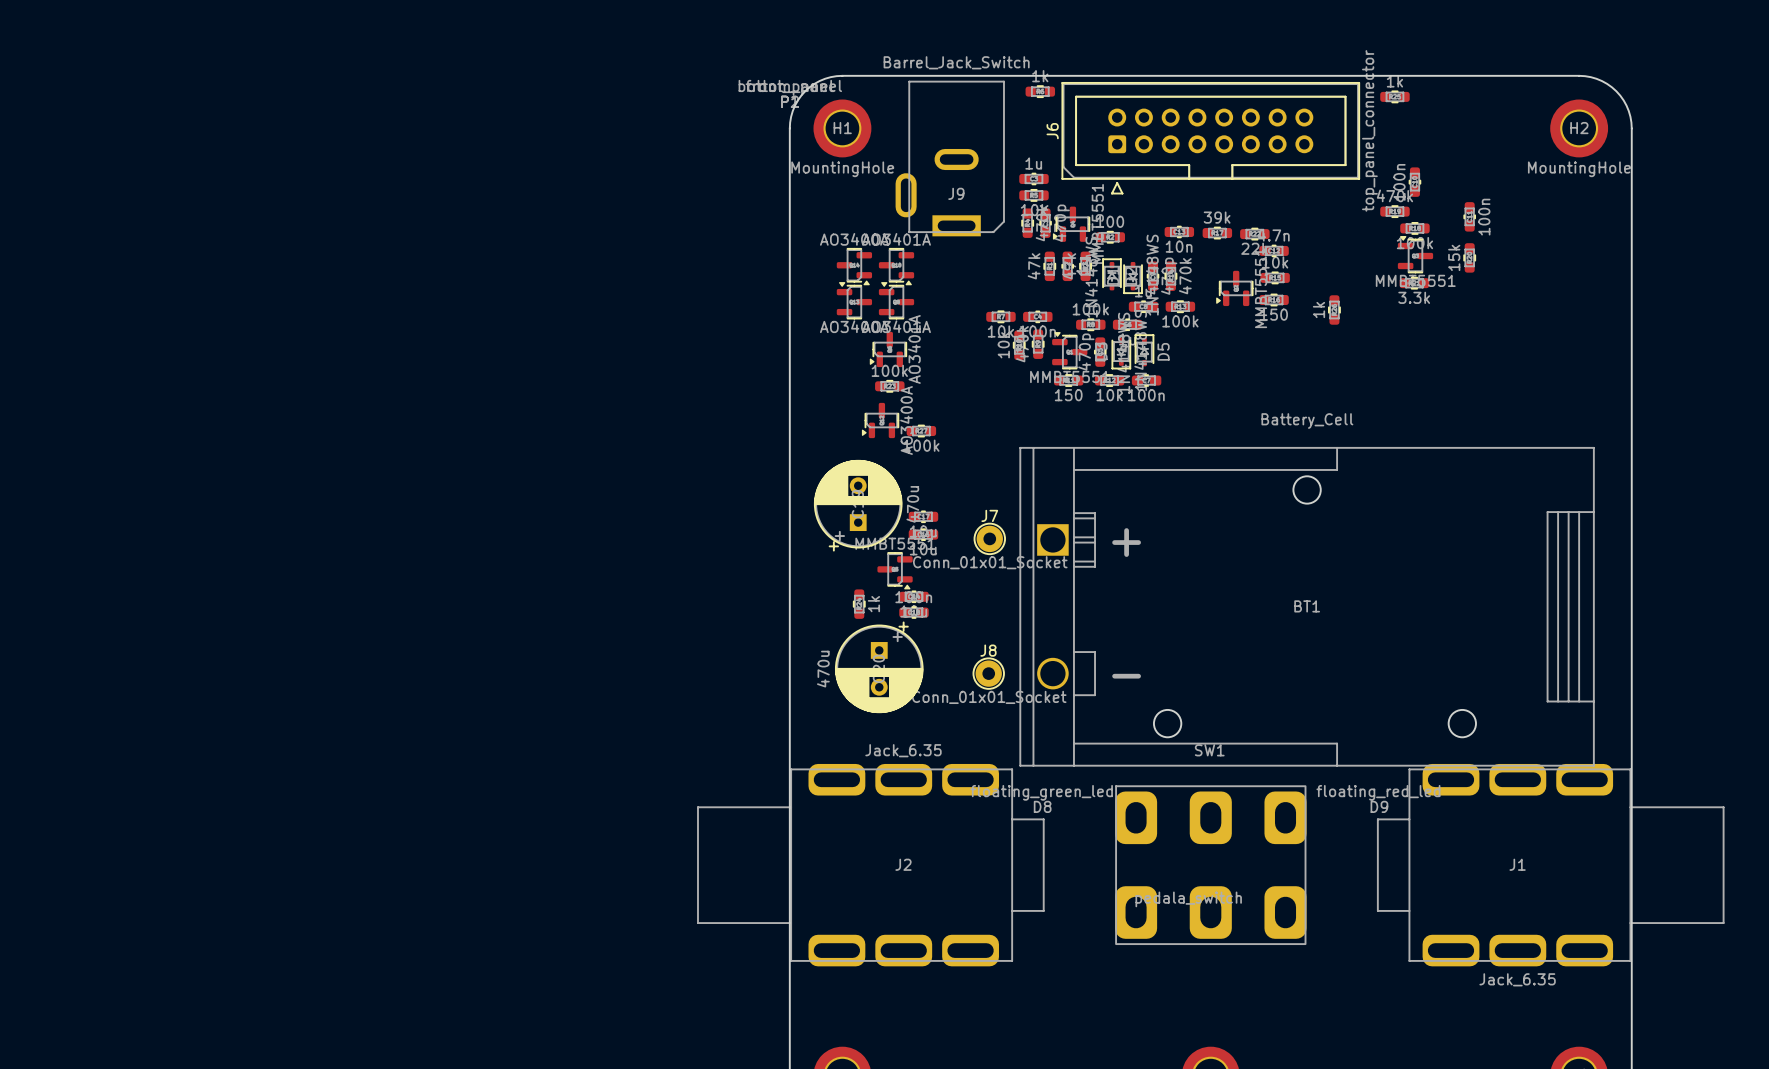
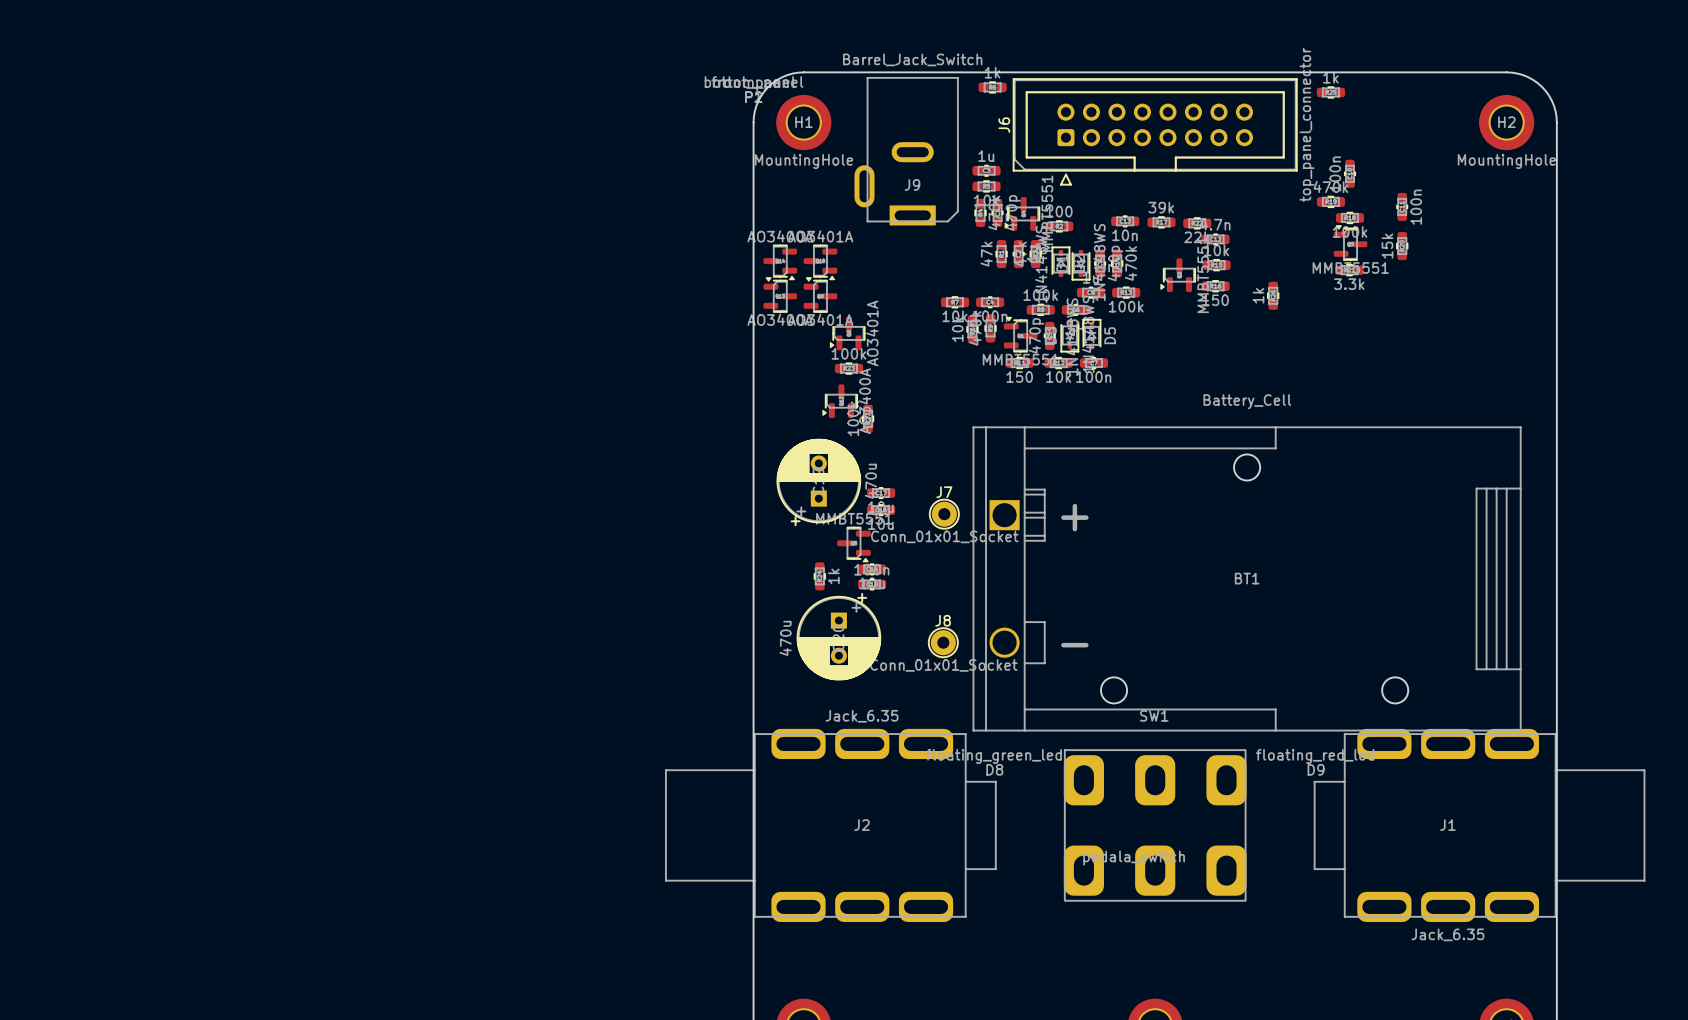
part position: (854, 266) -> (780, 262)
part position: (896, 266) -> (820, 262)
part position: (854, 300) -> (780, 294)
part position: (896, 300) -> (820, 294)
part rotation: 0° (921, 431) -> 90° clockwise (868, 418)

